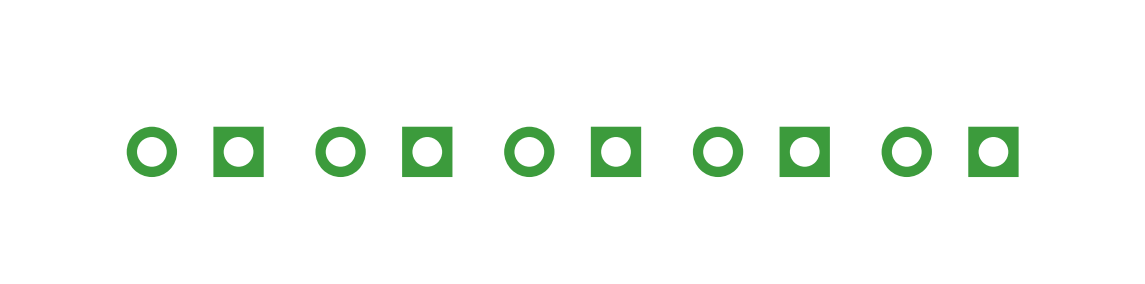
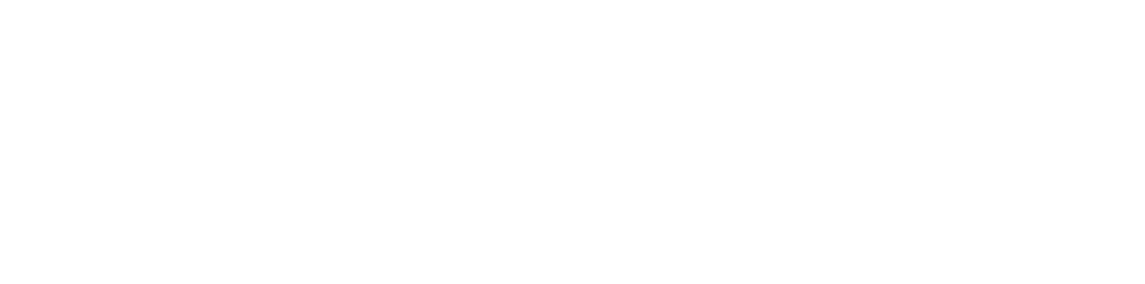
part: (195, 151) -> none
part: (383, 151) -> none
part: (572, 151) -> none
part: (761, 151) -> none
part: (950, 151) -> none

